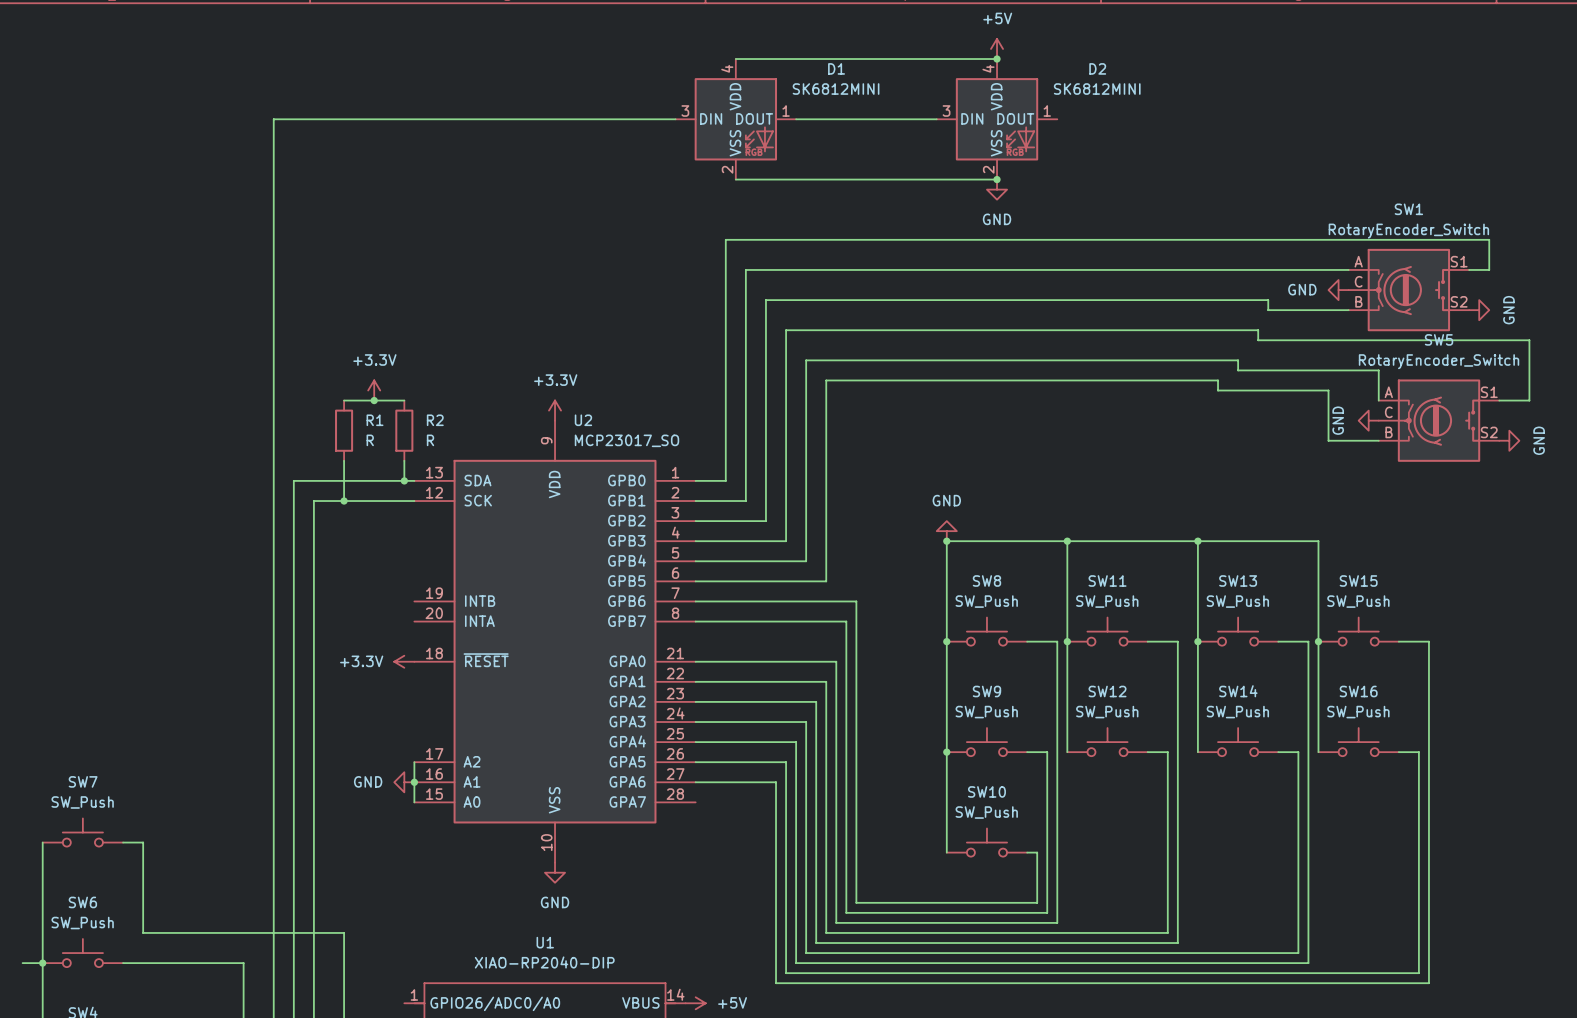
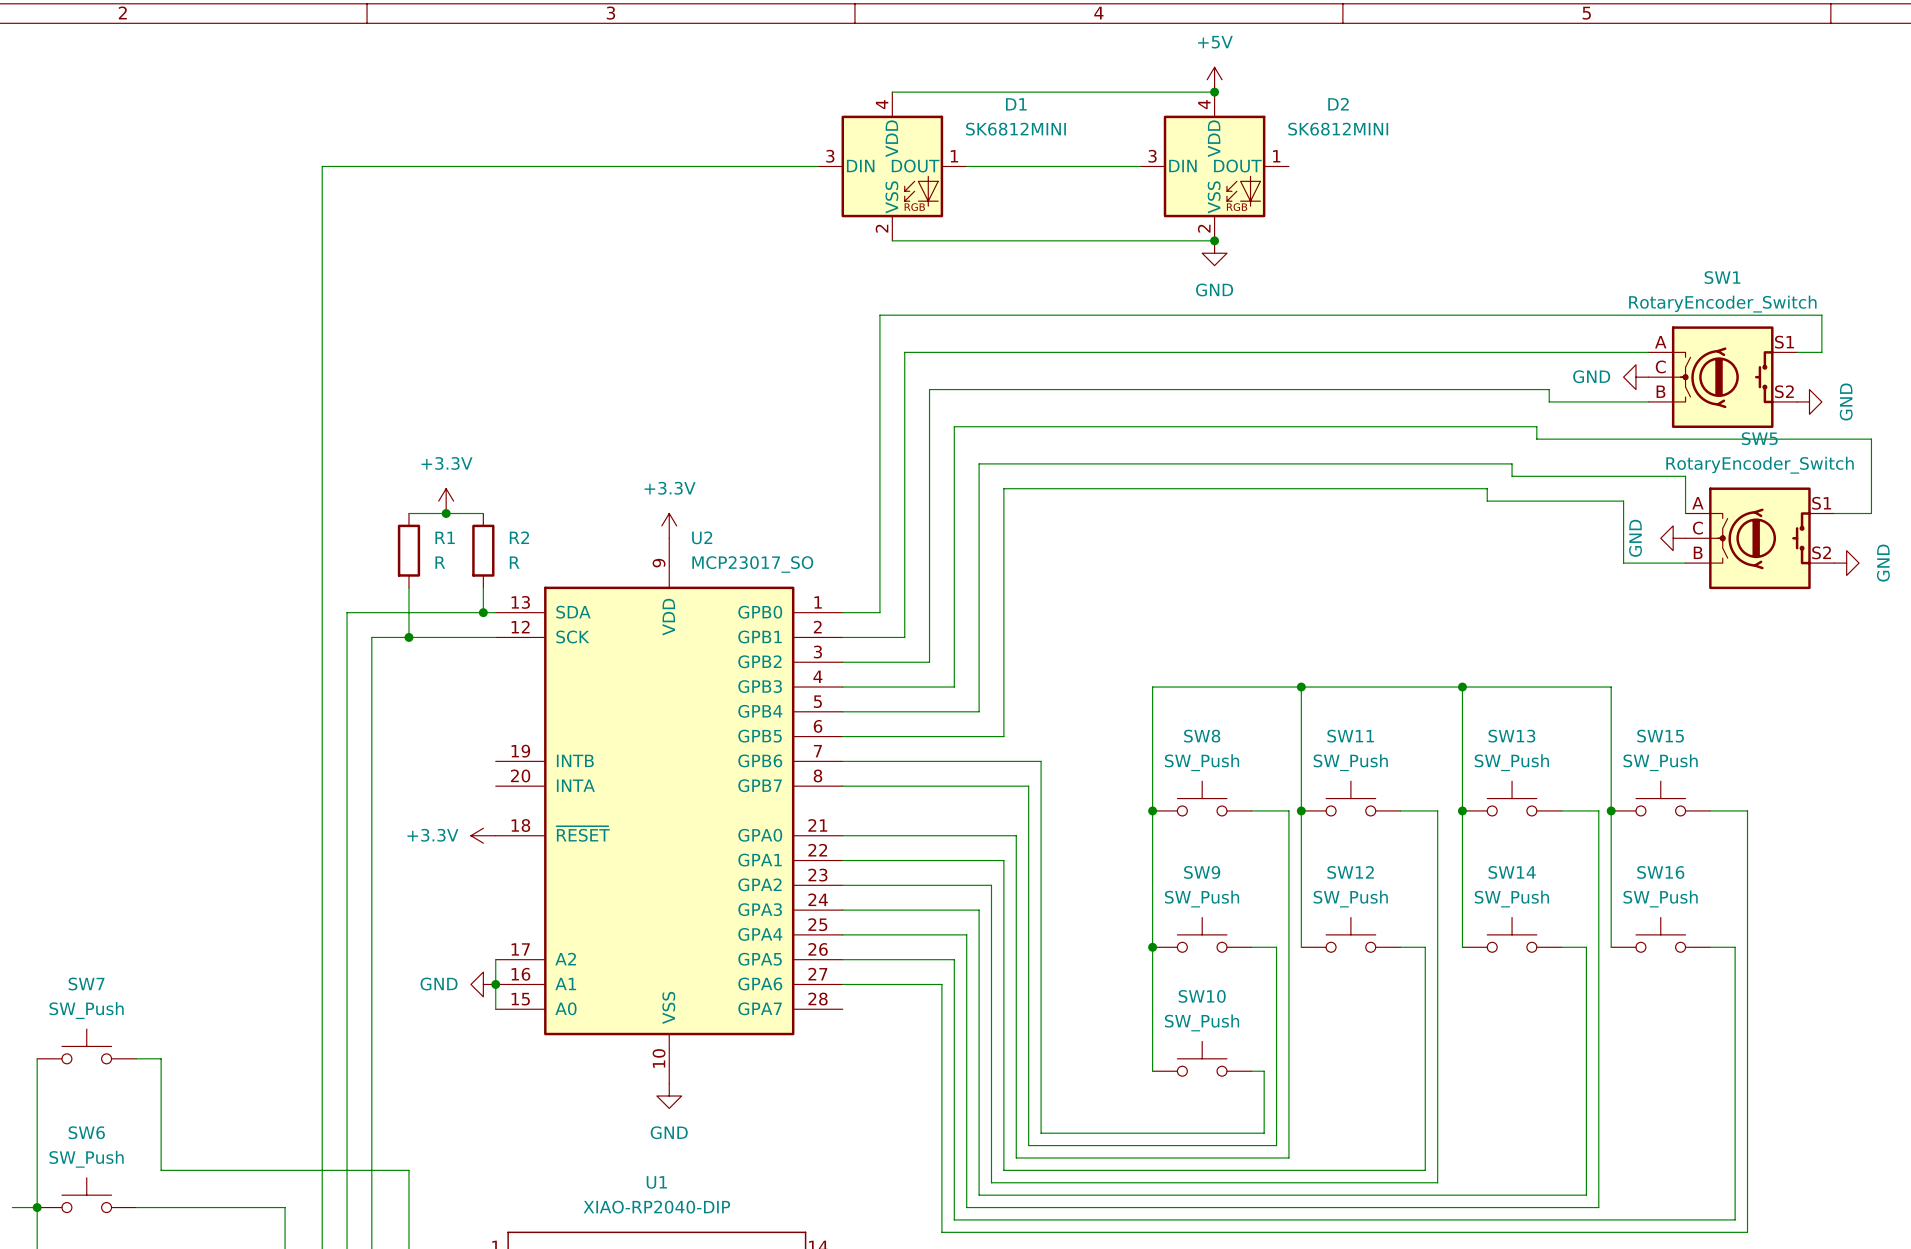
power symbol: GND (946, 531) -> none
junction: (946, 541) -> none

